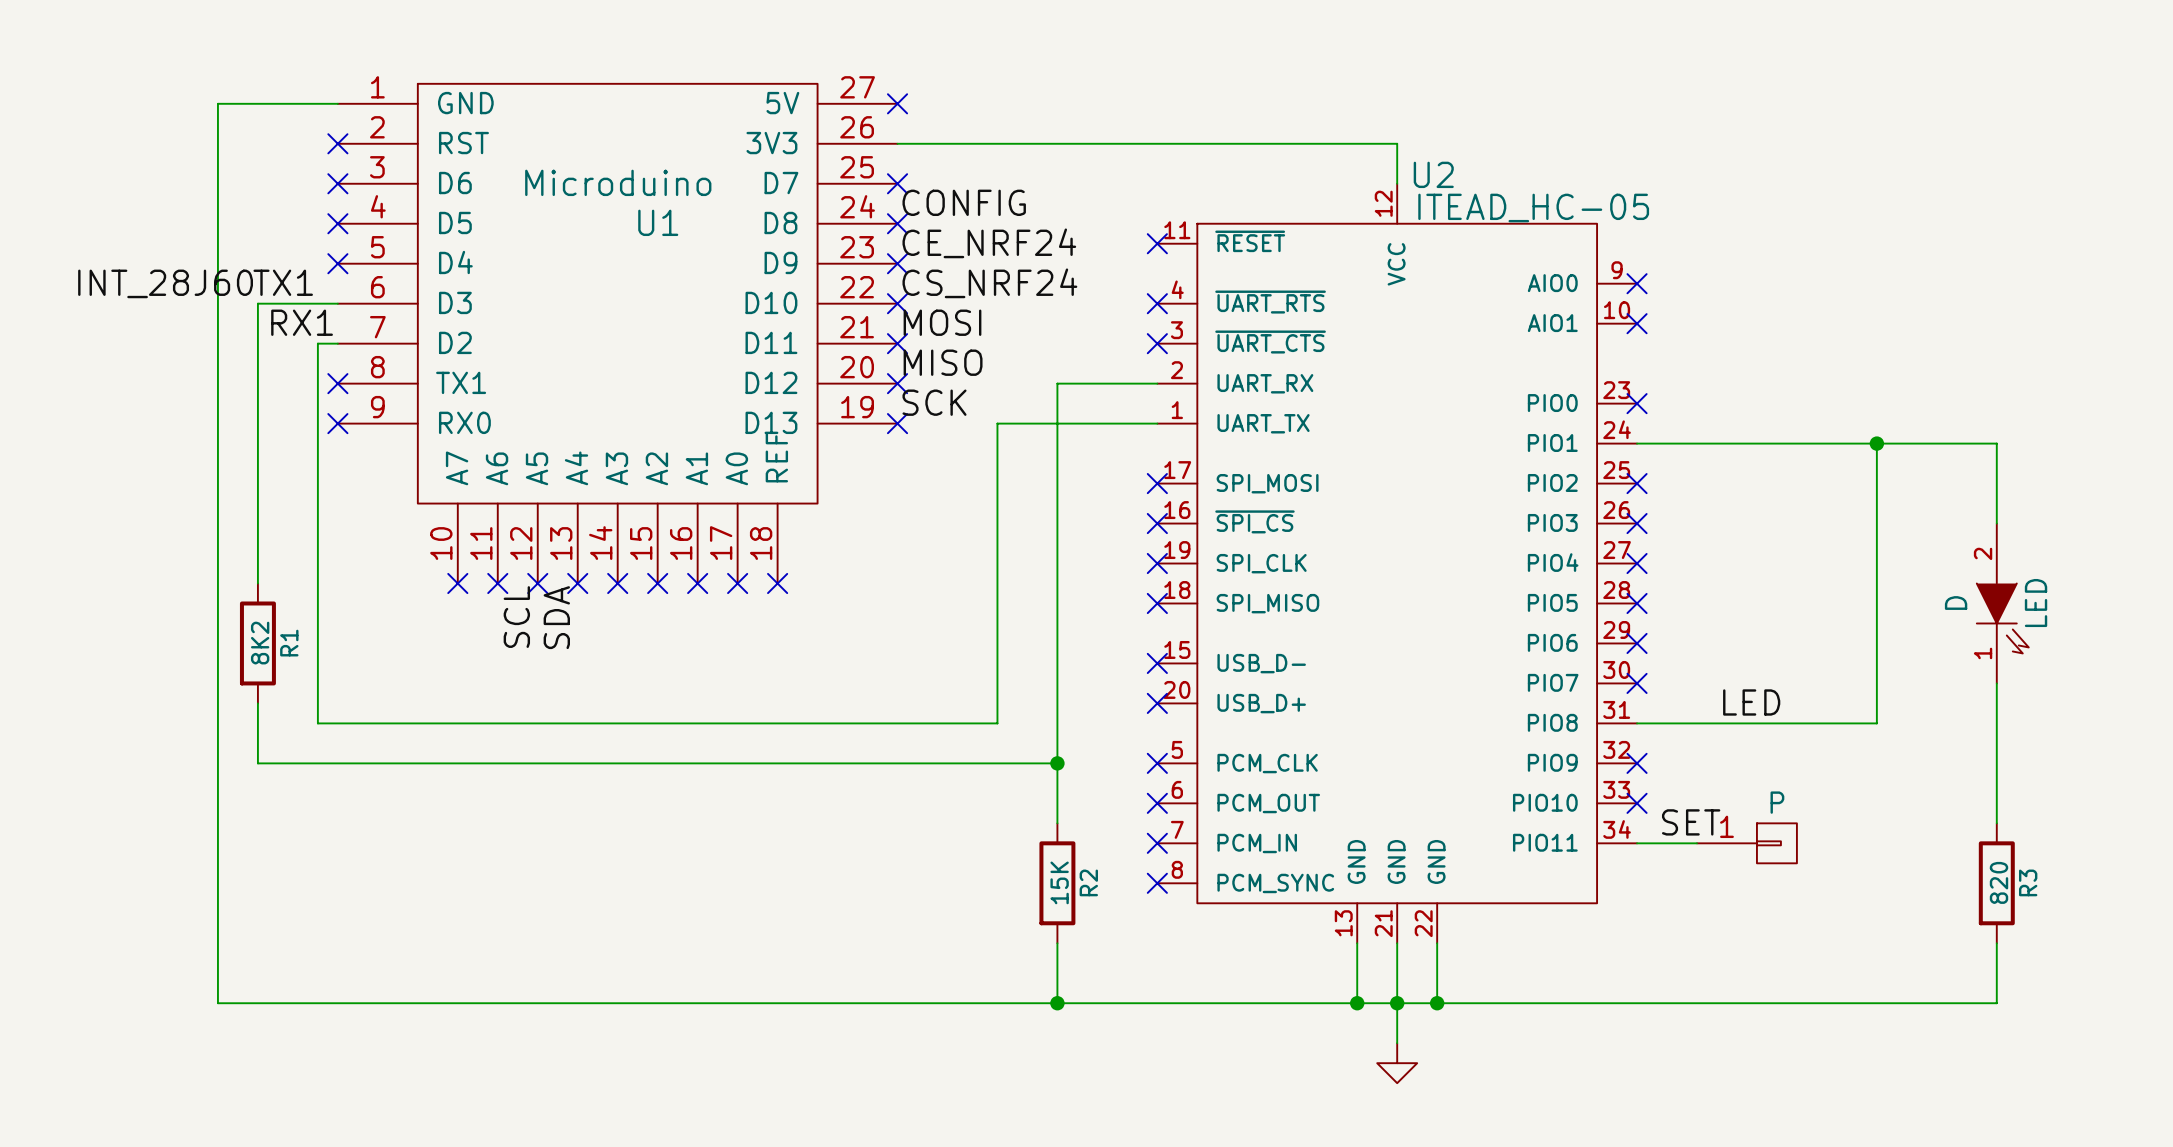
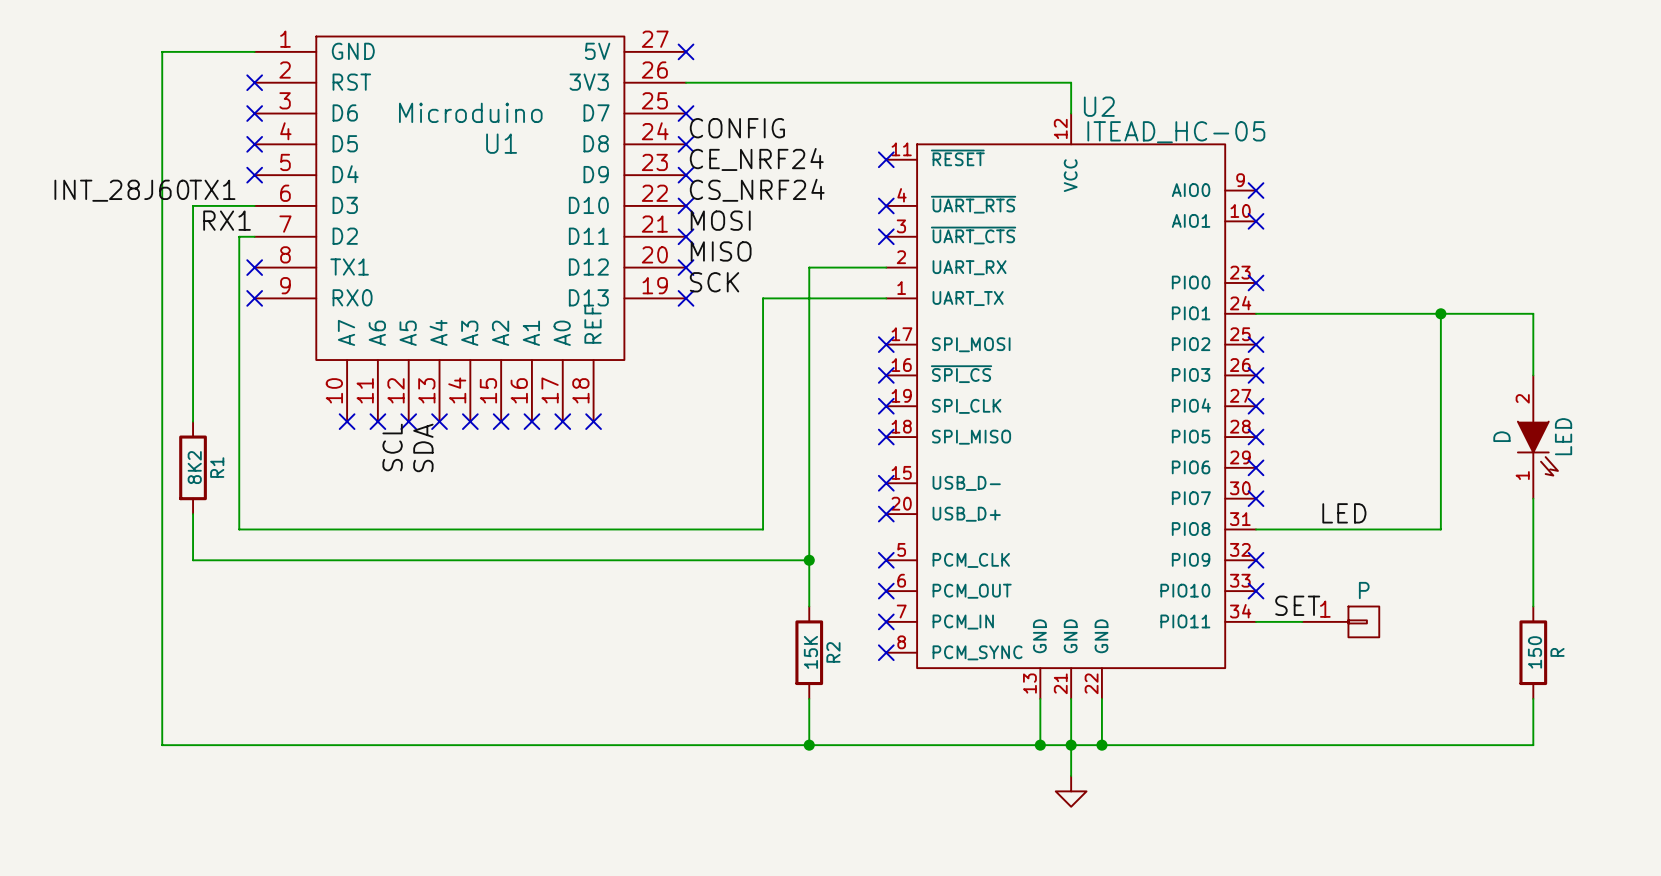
part text: 820 (1999, 882) -> 150 (1535, 652)
part text: R3 (2028, 882) -> R (1557, 652)

